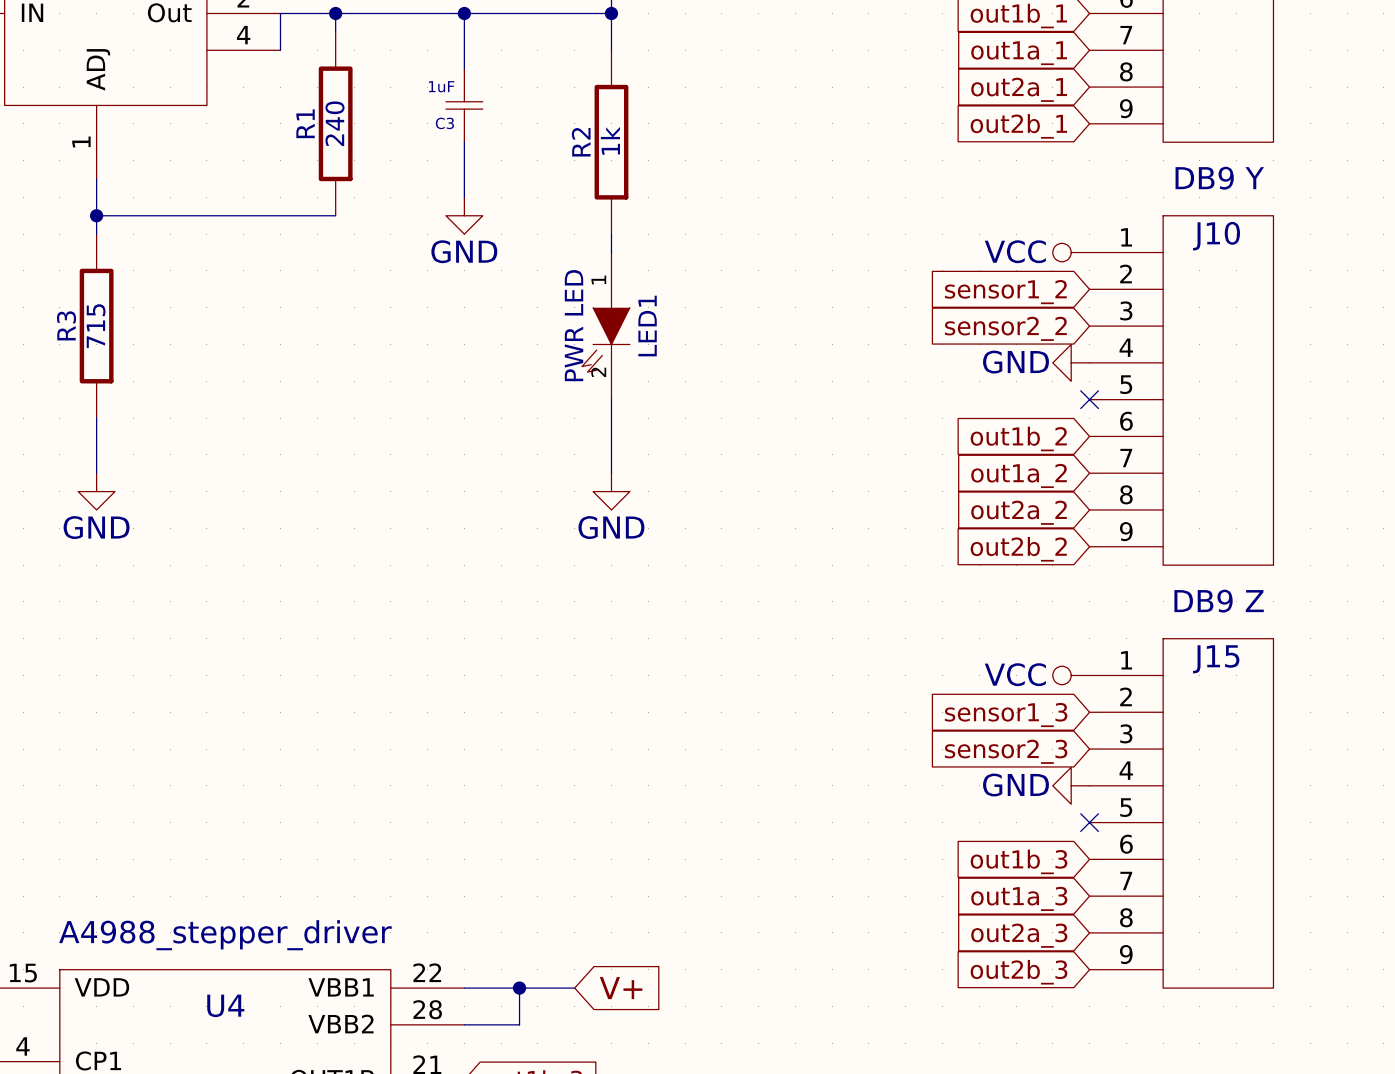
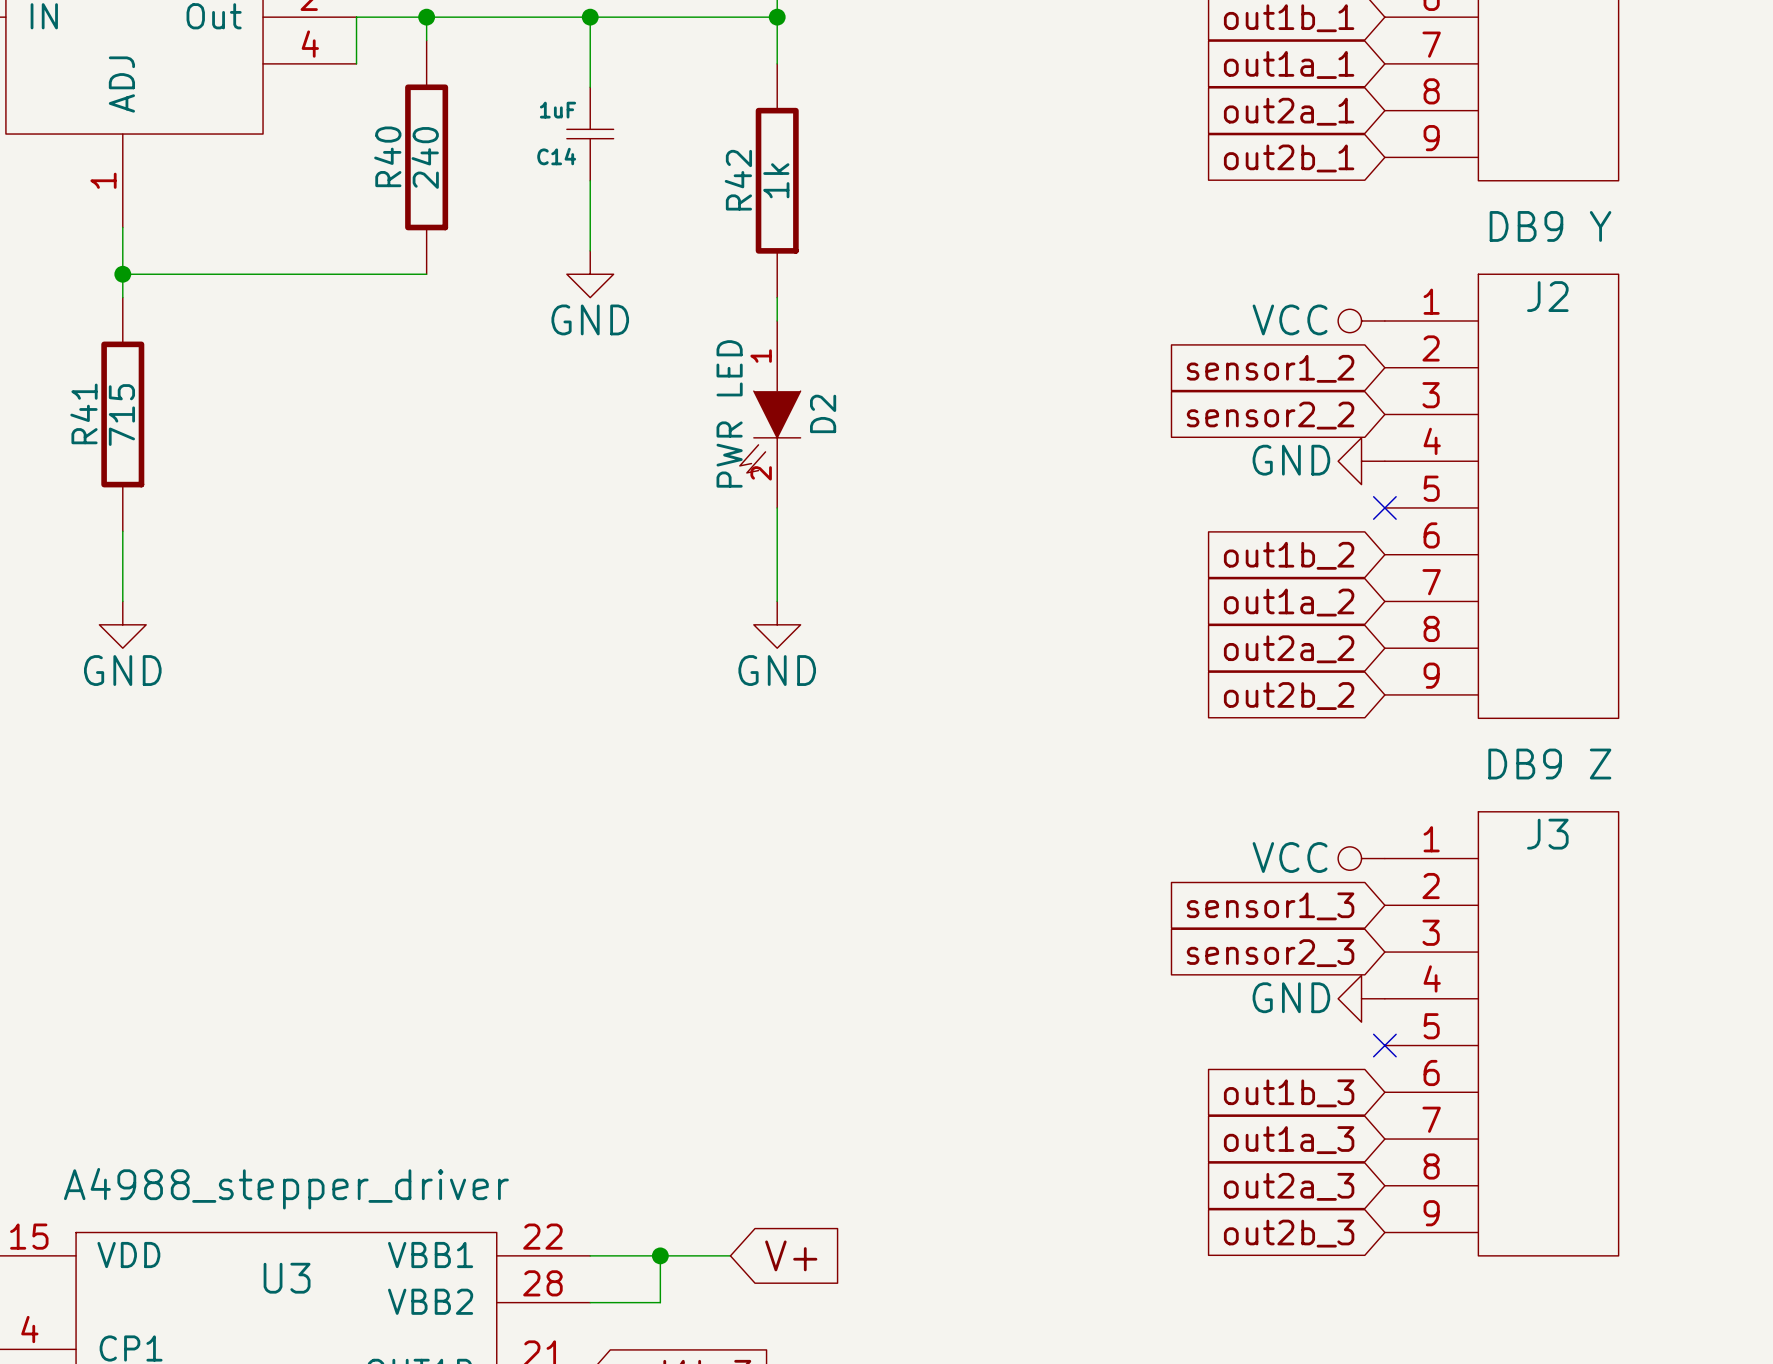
R1 name: R1 (305, 123) -> R40 (387, 156)
C3 name: C3 (444, 123) -> C14 (556, 156)
R2 name: R2 (581, 142) -> R42 (738, 180)
J10 name: J10 (1216, 236) -> J2 (1547, 296)
R3 name: R3 (66, 325) -> R41 (83, 413)
LED1 name: LED1 (647, 326) -> D2 (823, 413)
J15 name: J15 (1216, 659) -> J3 (1547, 834)
U4 name: U4 (225, 1005) -> U3 (287, 1278)

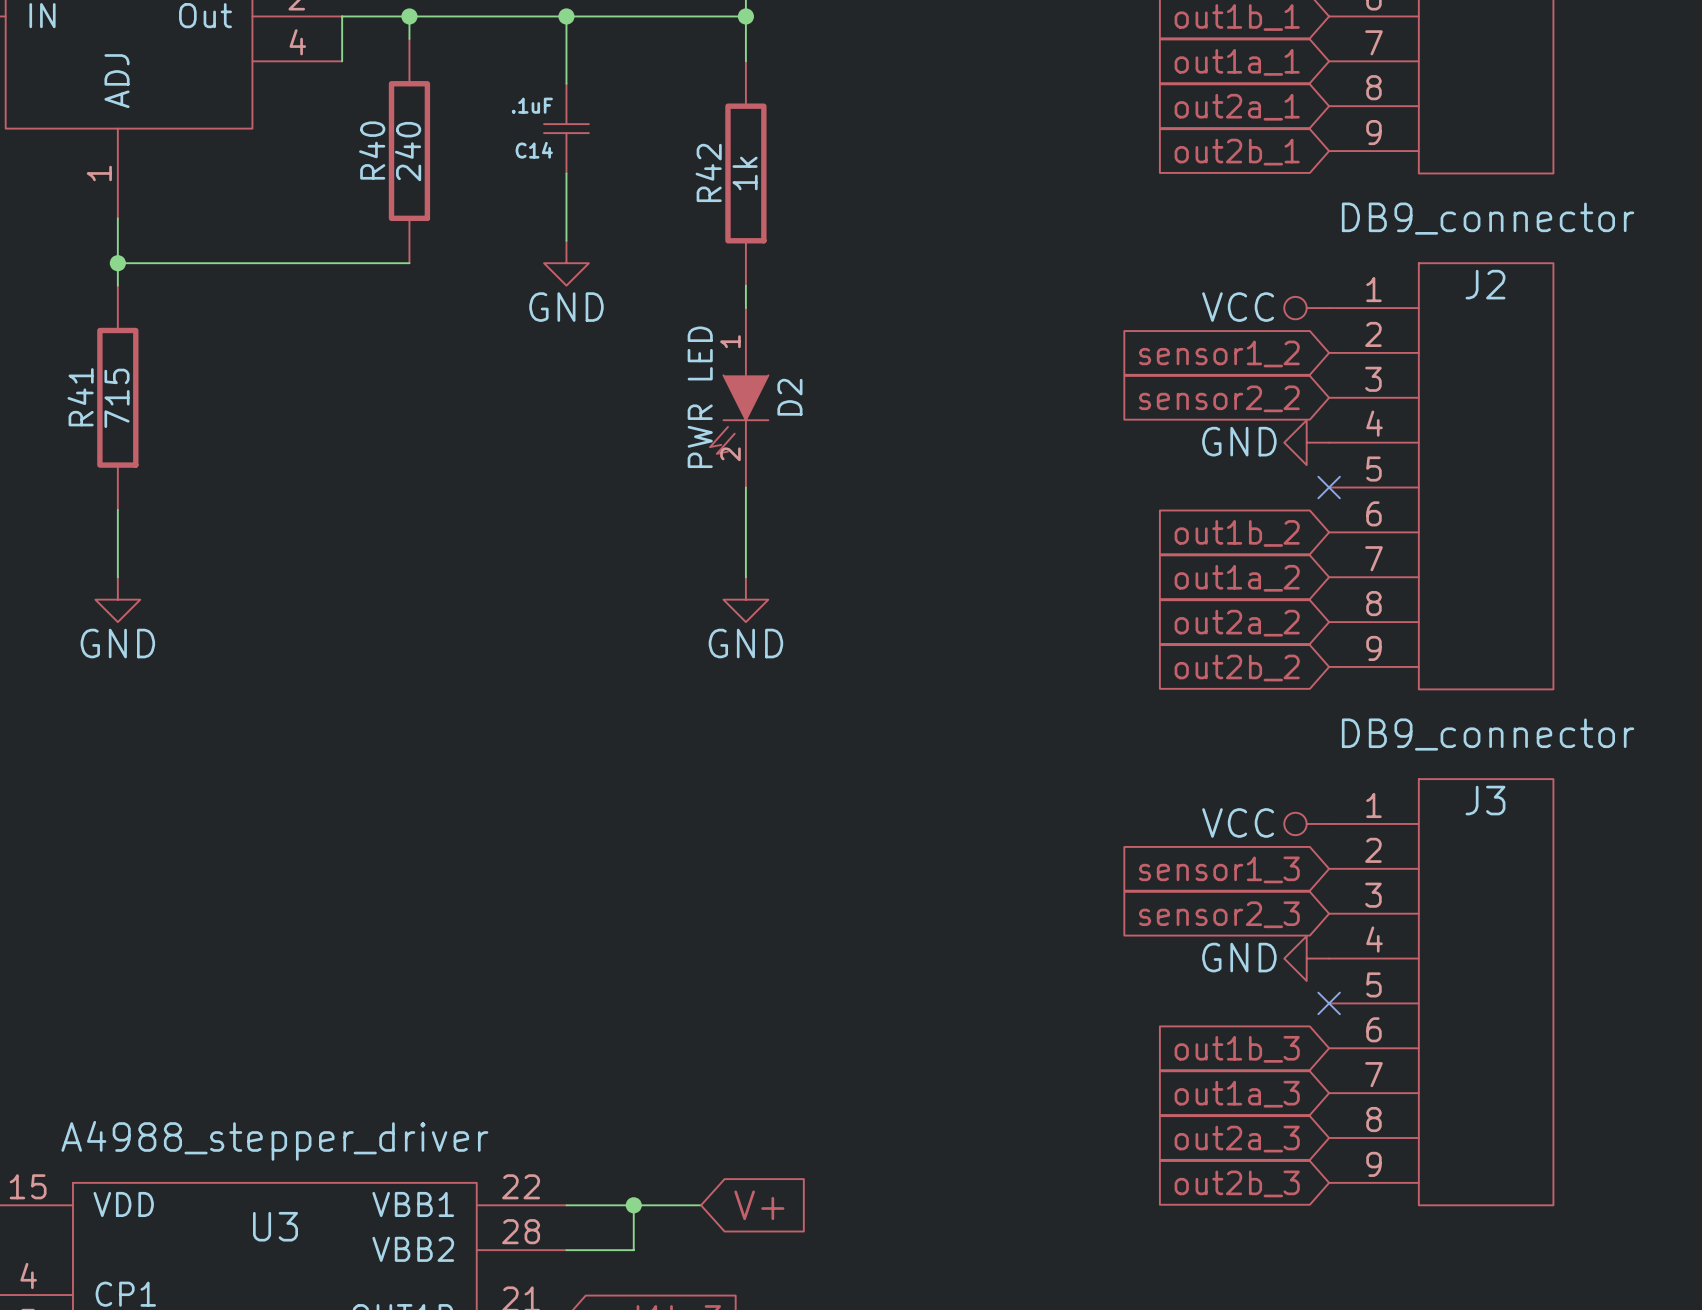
C14 value: 1uF (558, 110) -> .1uF (532, 105)
J2 value: DB9 Y (1550, 226) -> DB9_connector (1488, 218)
J3 value: DB9 Z (1549, 764) -> DB9_connector (1488, 734)

